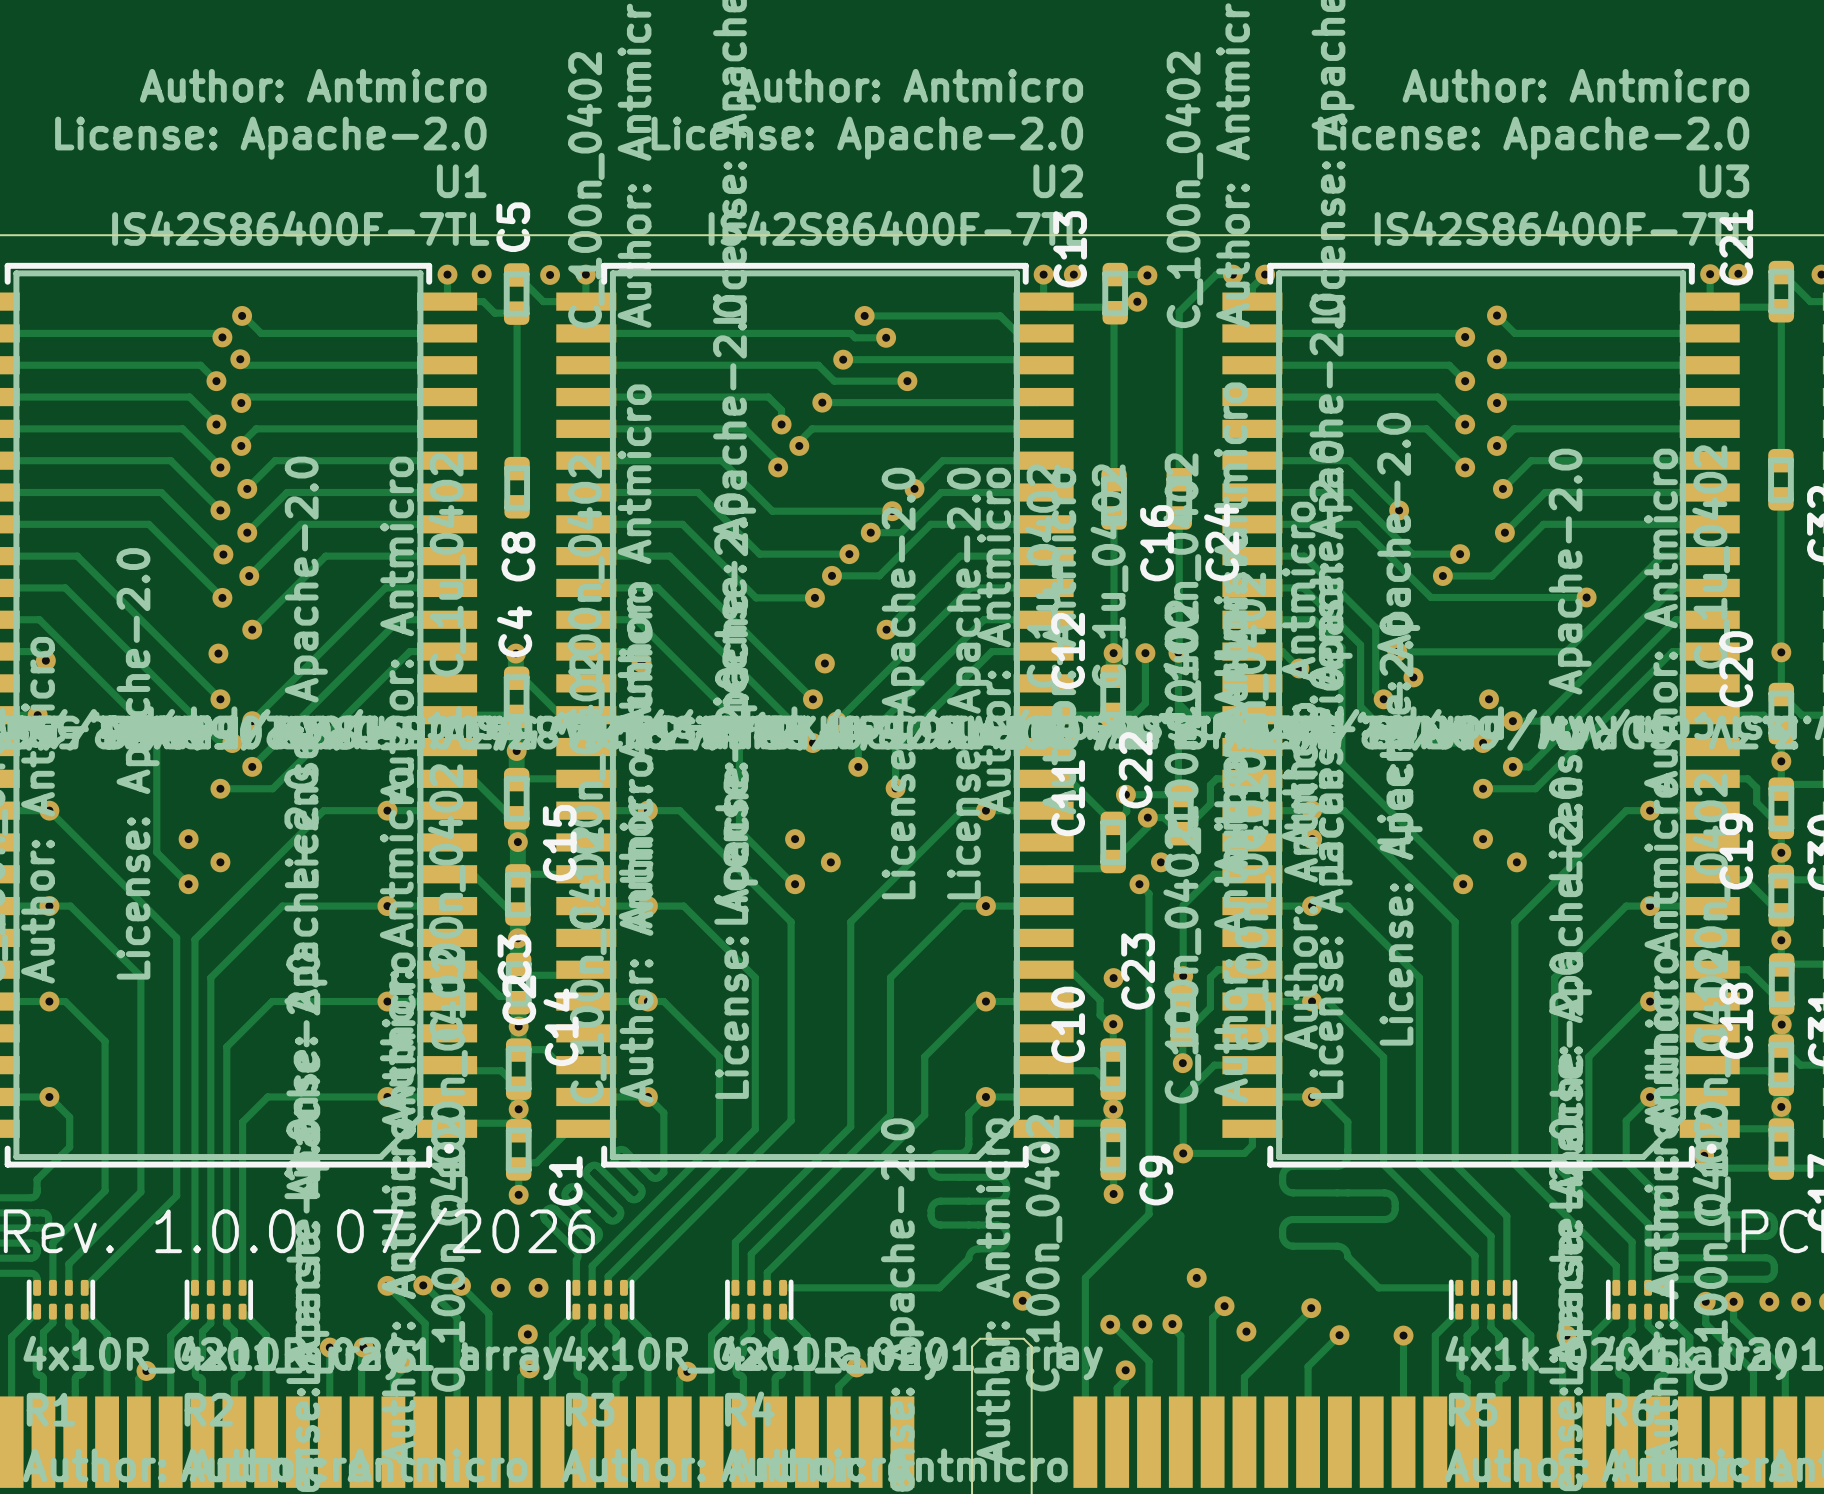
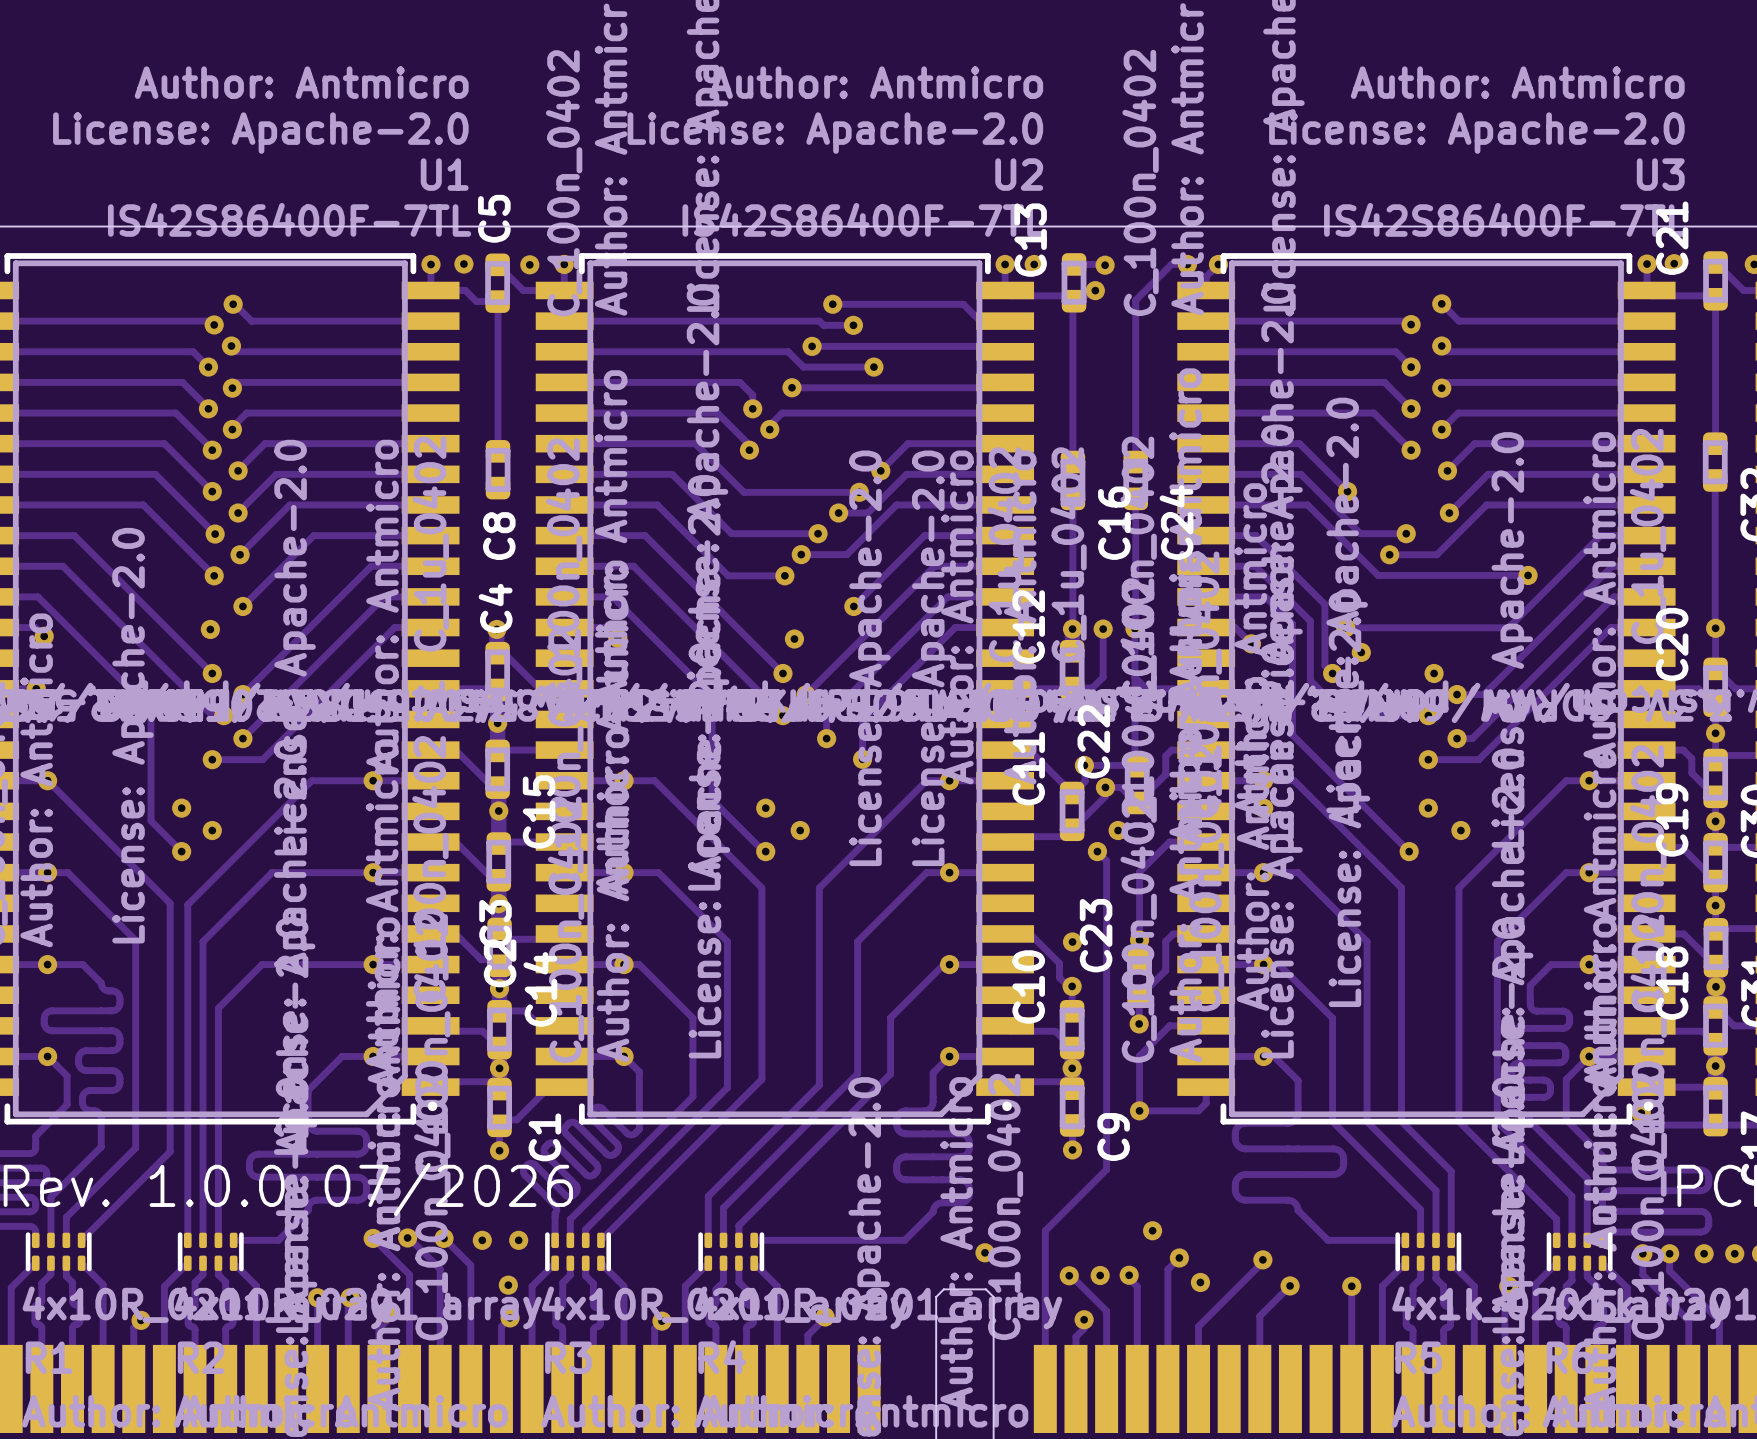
track: (65, 1001) (105, 1041) (105, 1161) -> (62, 964) (82, 964) (101, 982) (104, 989) (115, 991) (119, 996) (119, 1005) (114, 1010) (51, 1010) (46, 1013) (44, 1017) (44, 1025) (50, 1030) (112, 1030) (118, 1034) (119, 1043) (116, 1049) (85, 1050) (78, 1056) (79, 1065) (83, 1069) (113, 1070) (119, 1075) (119, 1084) (116, 1089) (89, 1090) (83, 1095) (84, 1107) (97, 1111) (101, 1118)
track: (1644, 1001) (1588, 1056) (1588, 1164) -> (1583, 964) (1551, 964) (1530, 985) (1530, 1005) (1532, 1009) (1536, 1011) (1565, 1011) (1569, 1017) (1567, 1026) (1562, 1028) (1517, 1028) (1512, 1033) (1512, 1041) (1516, 1045) (1559, 1045) (1565, 1050) (1565, 1058) (1560, 1062) (1517, 1062) (1512, 1066) (1511, 1074) (1515, 1079) (1544, 1080) (1550, 1085) (1549, 1093) (1546, 1096) (1517, 1097) (1512, 1100) (1513, 1111) (1526, 1115) (1530, 1121)
track: (355, 1096) (267, 1096) (242, 1122) (242, 1287) -> (342, 1056) (308, 1090) (308, 1124) (311, 1129) (316, 1131) (361, 1132) (366, 1138) (364, 1150) (357, 1154) (257, 1154) (250, 1159) (249, 1168) (252, 1174) (257, 1177) (359, 1177) (366, 1183) (365, 1195) (358, 1200) (313, 1201) (308, 1205) (308, 1210) (278, 1240) (233, 1240)

